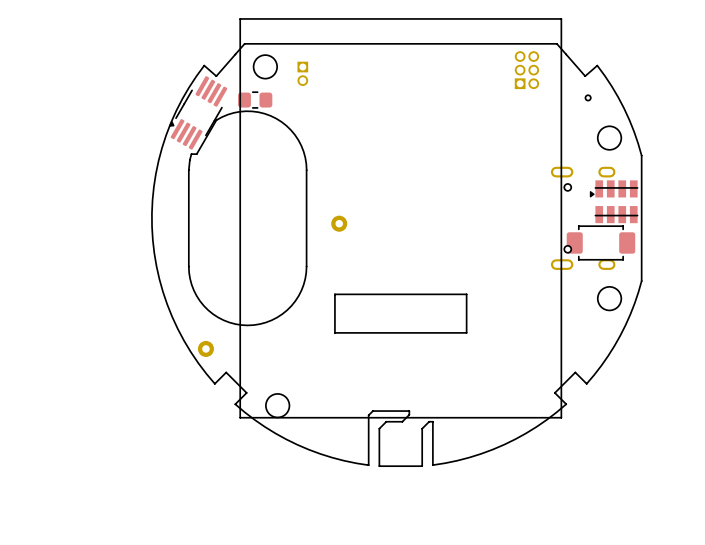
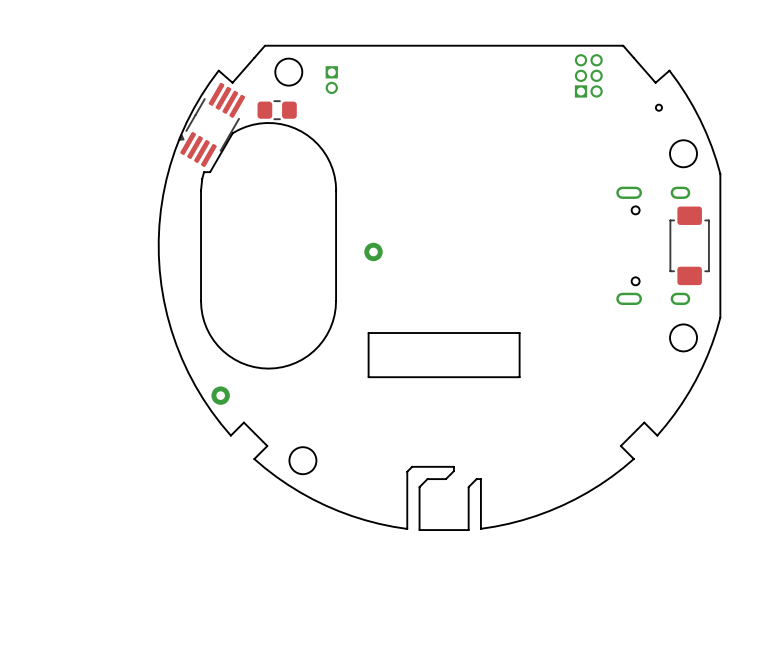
line: (240, 18) (561, 18) (561, 417) (240, 417) (240, 18) -> none
part: (614, 201) -> none
part rotation: 0° (600, 242) -> 90° clockwise (689, 245)

